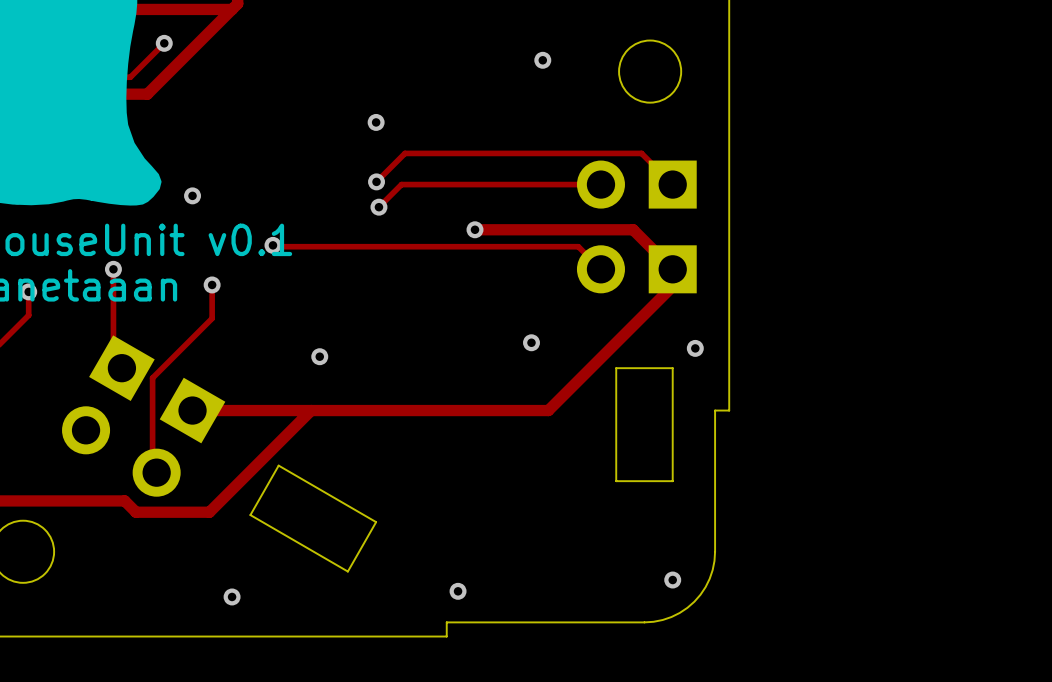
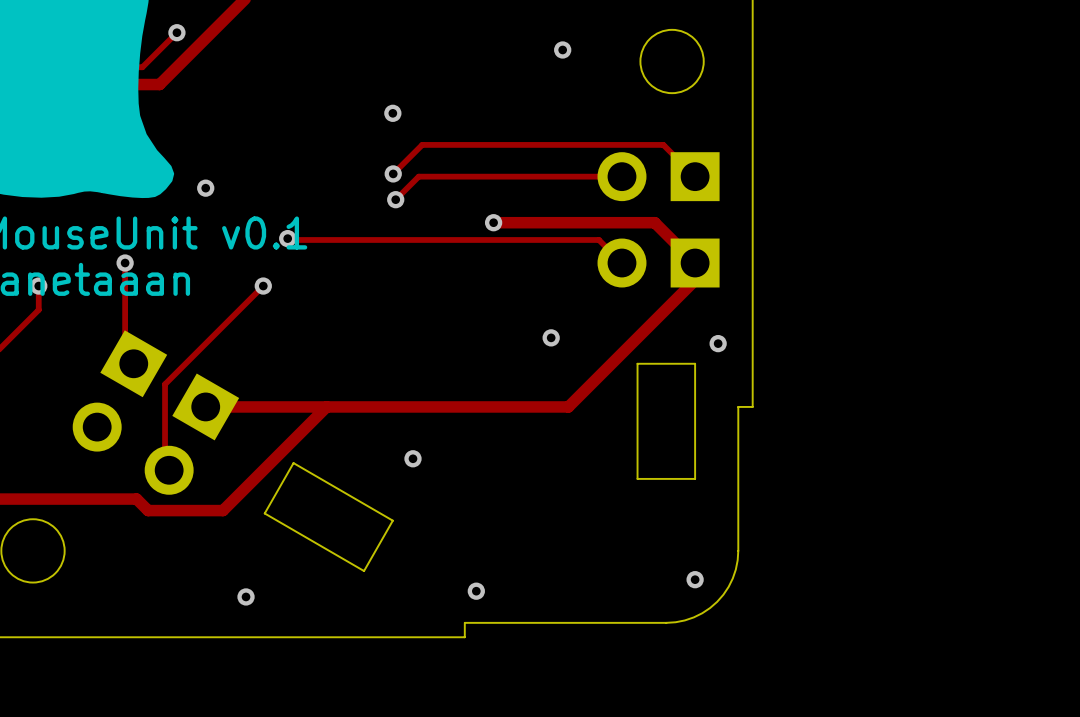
track: (212, 284) (212, 318) (152, 378) (152, 388) -> (263, 286) (165, 384)
via position: (212, 284) -> (263, 286)
via: (319, 356) -> none
via: none -> (412, 458)

